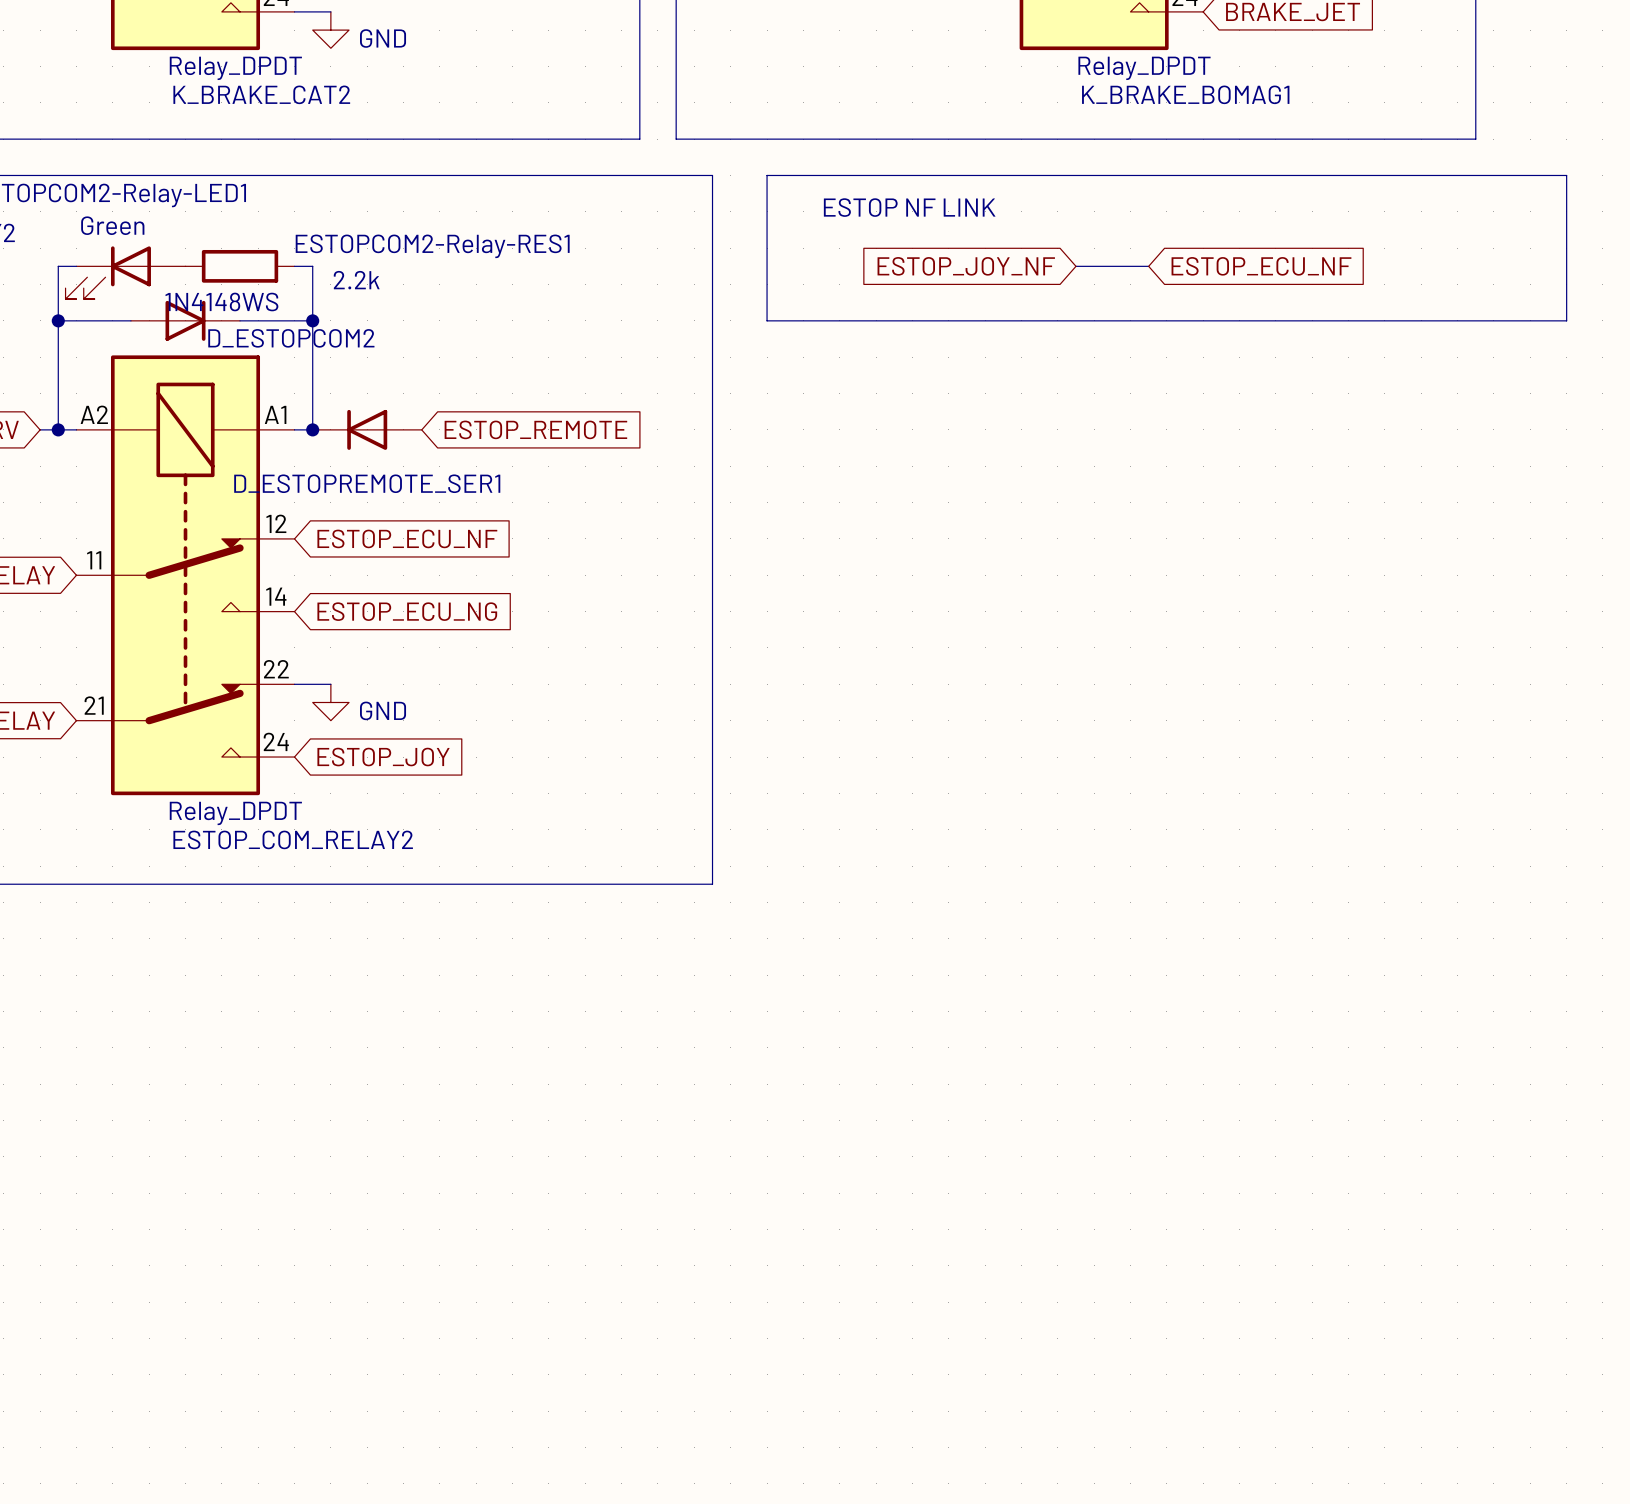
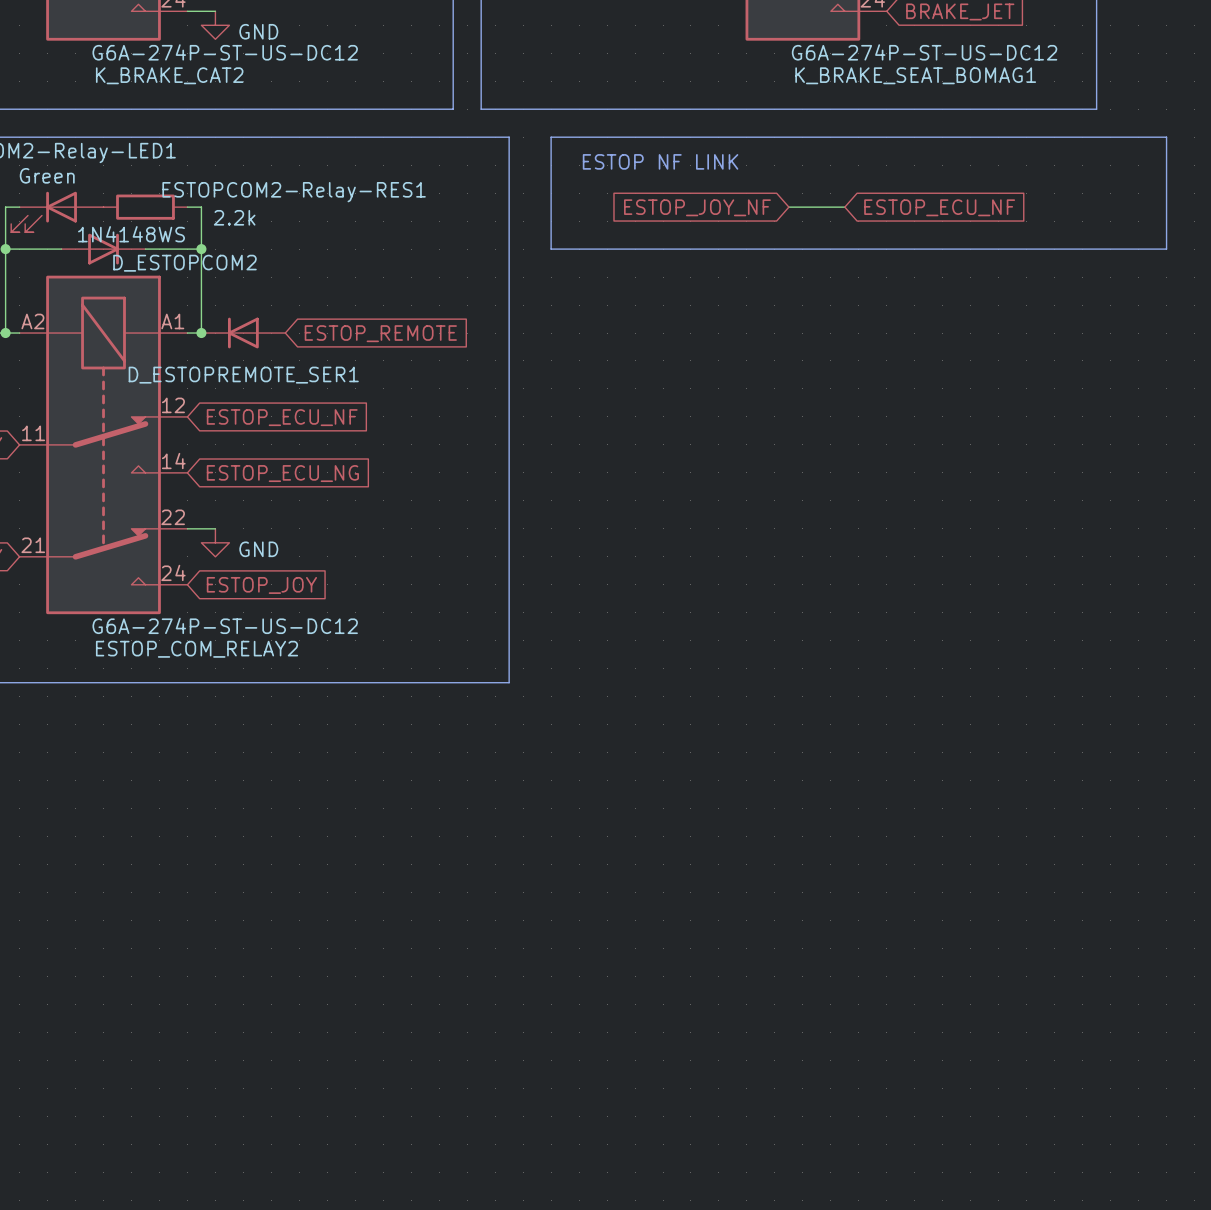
K_BRAKE_CAT2 value: Relay_DPDT (235, 68) -> G6A-274P-ST-US-DC12 (225, 52)
K_BRAKE_BOMAG1 value: Relay_DPDT (1144, 68) -> G6A-274P-ST-US-DC12 (924, 52)
K_BRAKE_BOMAG1 name: K_BRAKE_BOMAG1 (1185, 94) -> K_BRAKE_SEAT_BOMAG1 (915, 75)
ESTOP_COM_RELAY2 value: Relay_DPDT (235, 813) -> G6A-274P-ST-US-DC12 (225, 625)

